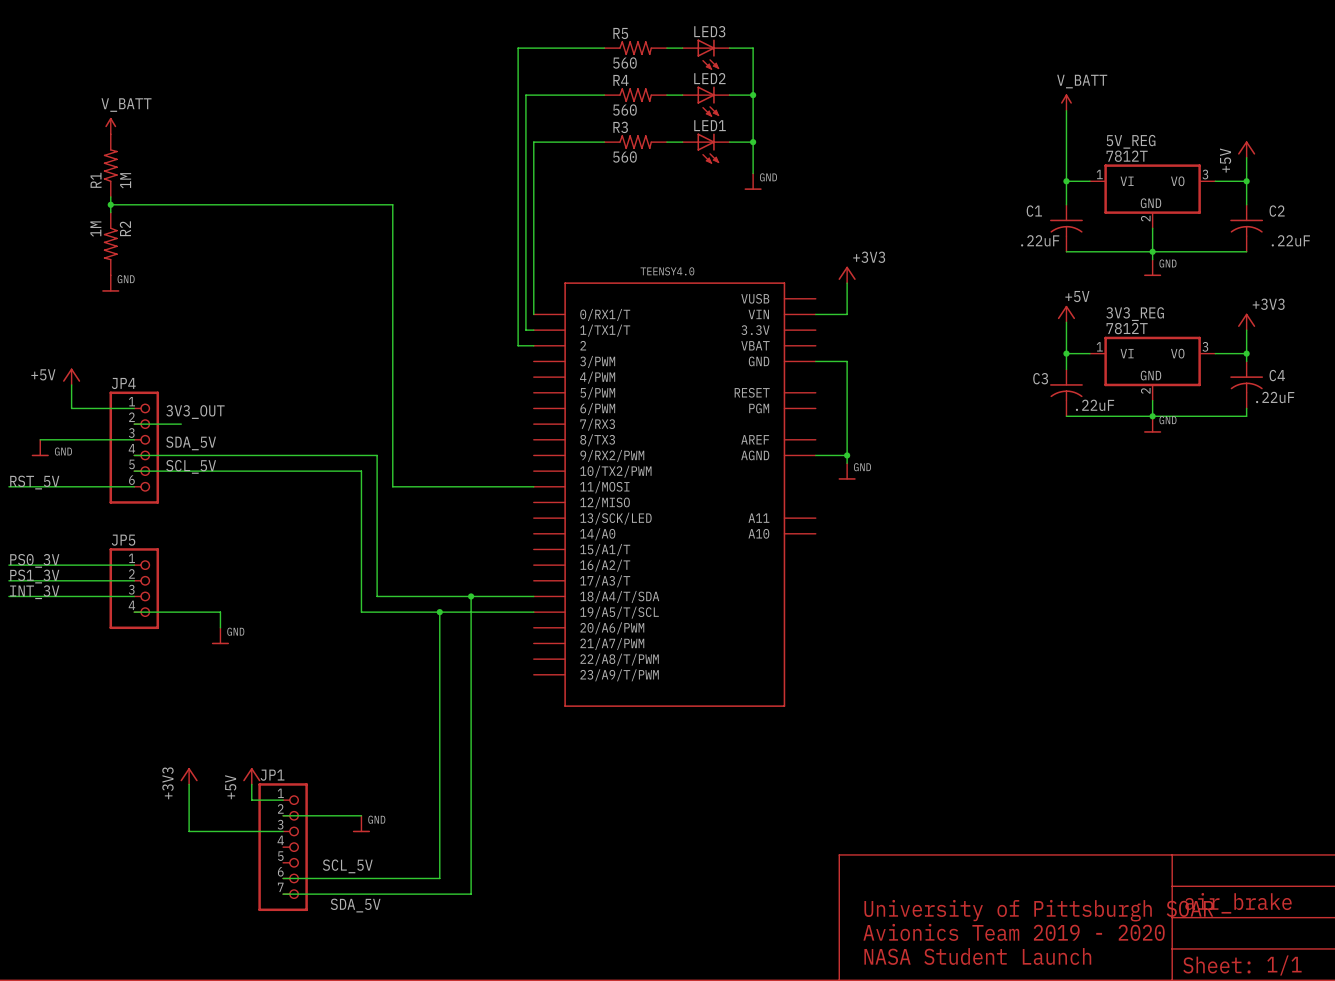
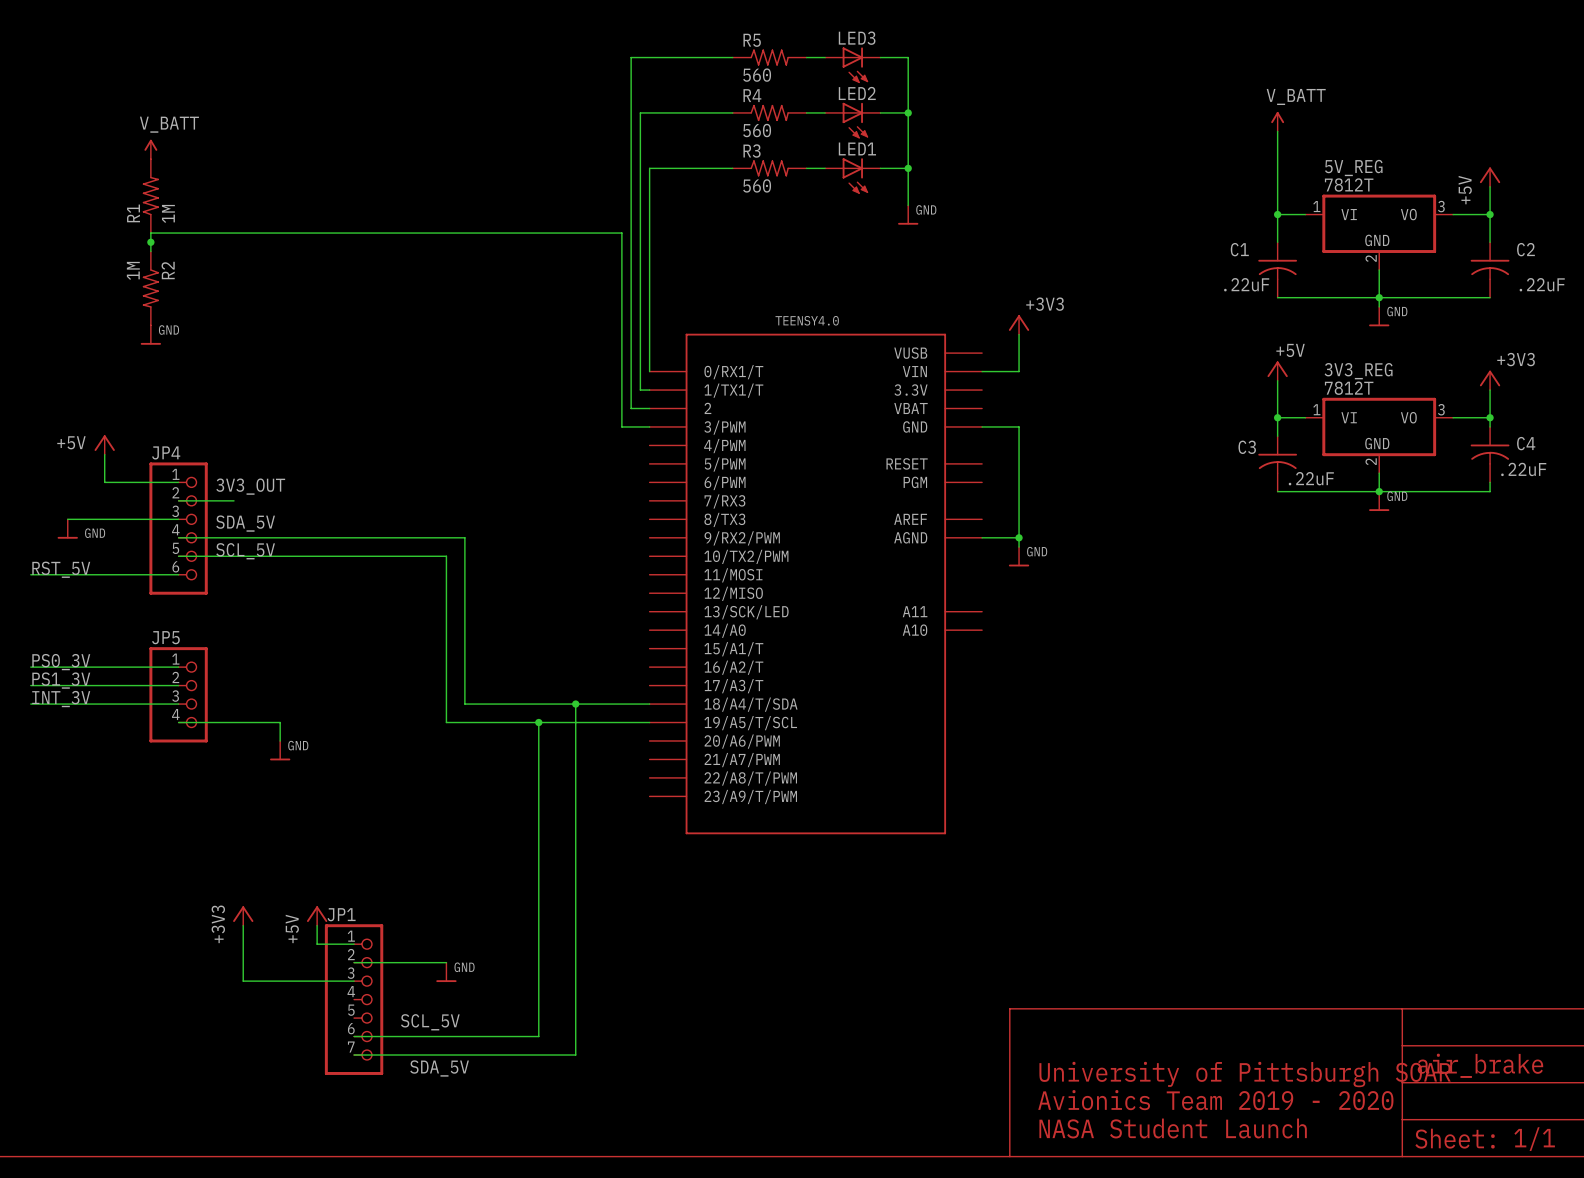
wire: none -> (150, 233) (621, 233) (621, 426) (649, 426)
wire: (110, 204) (392, 204) (392, 486) (533, 486) -> none

